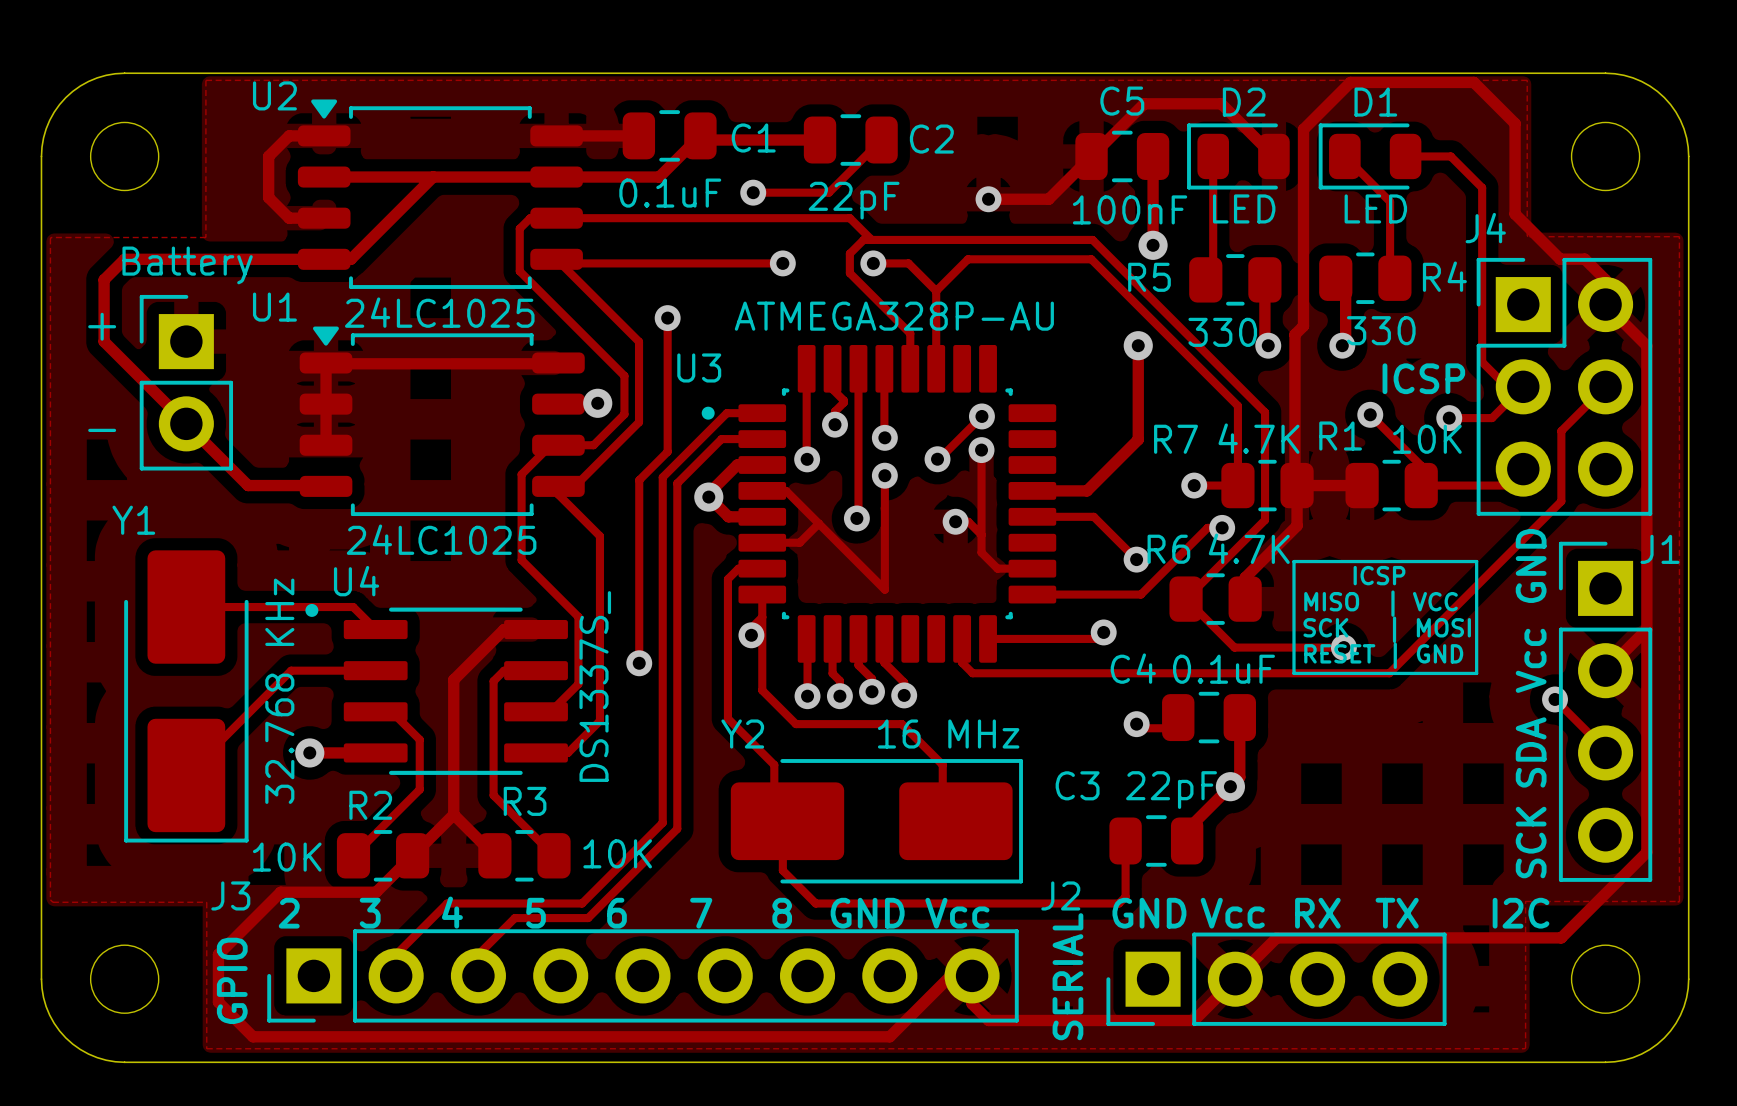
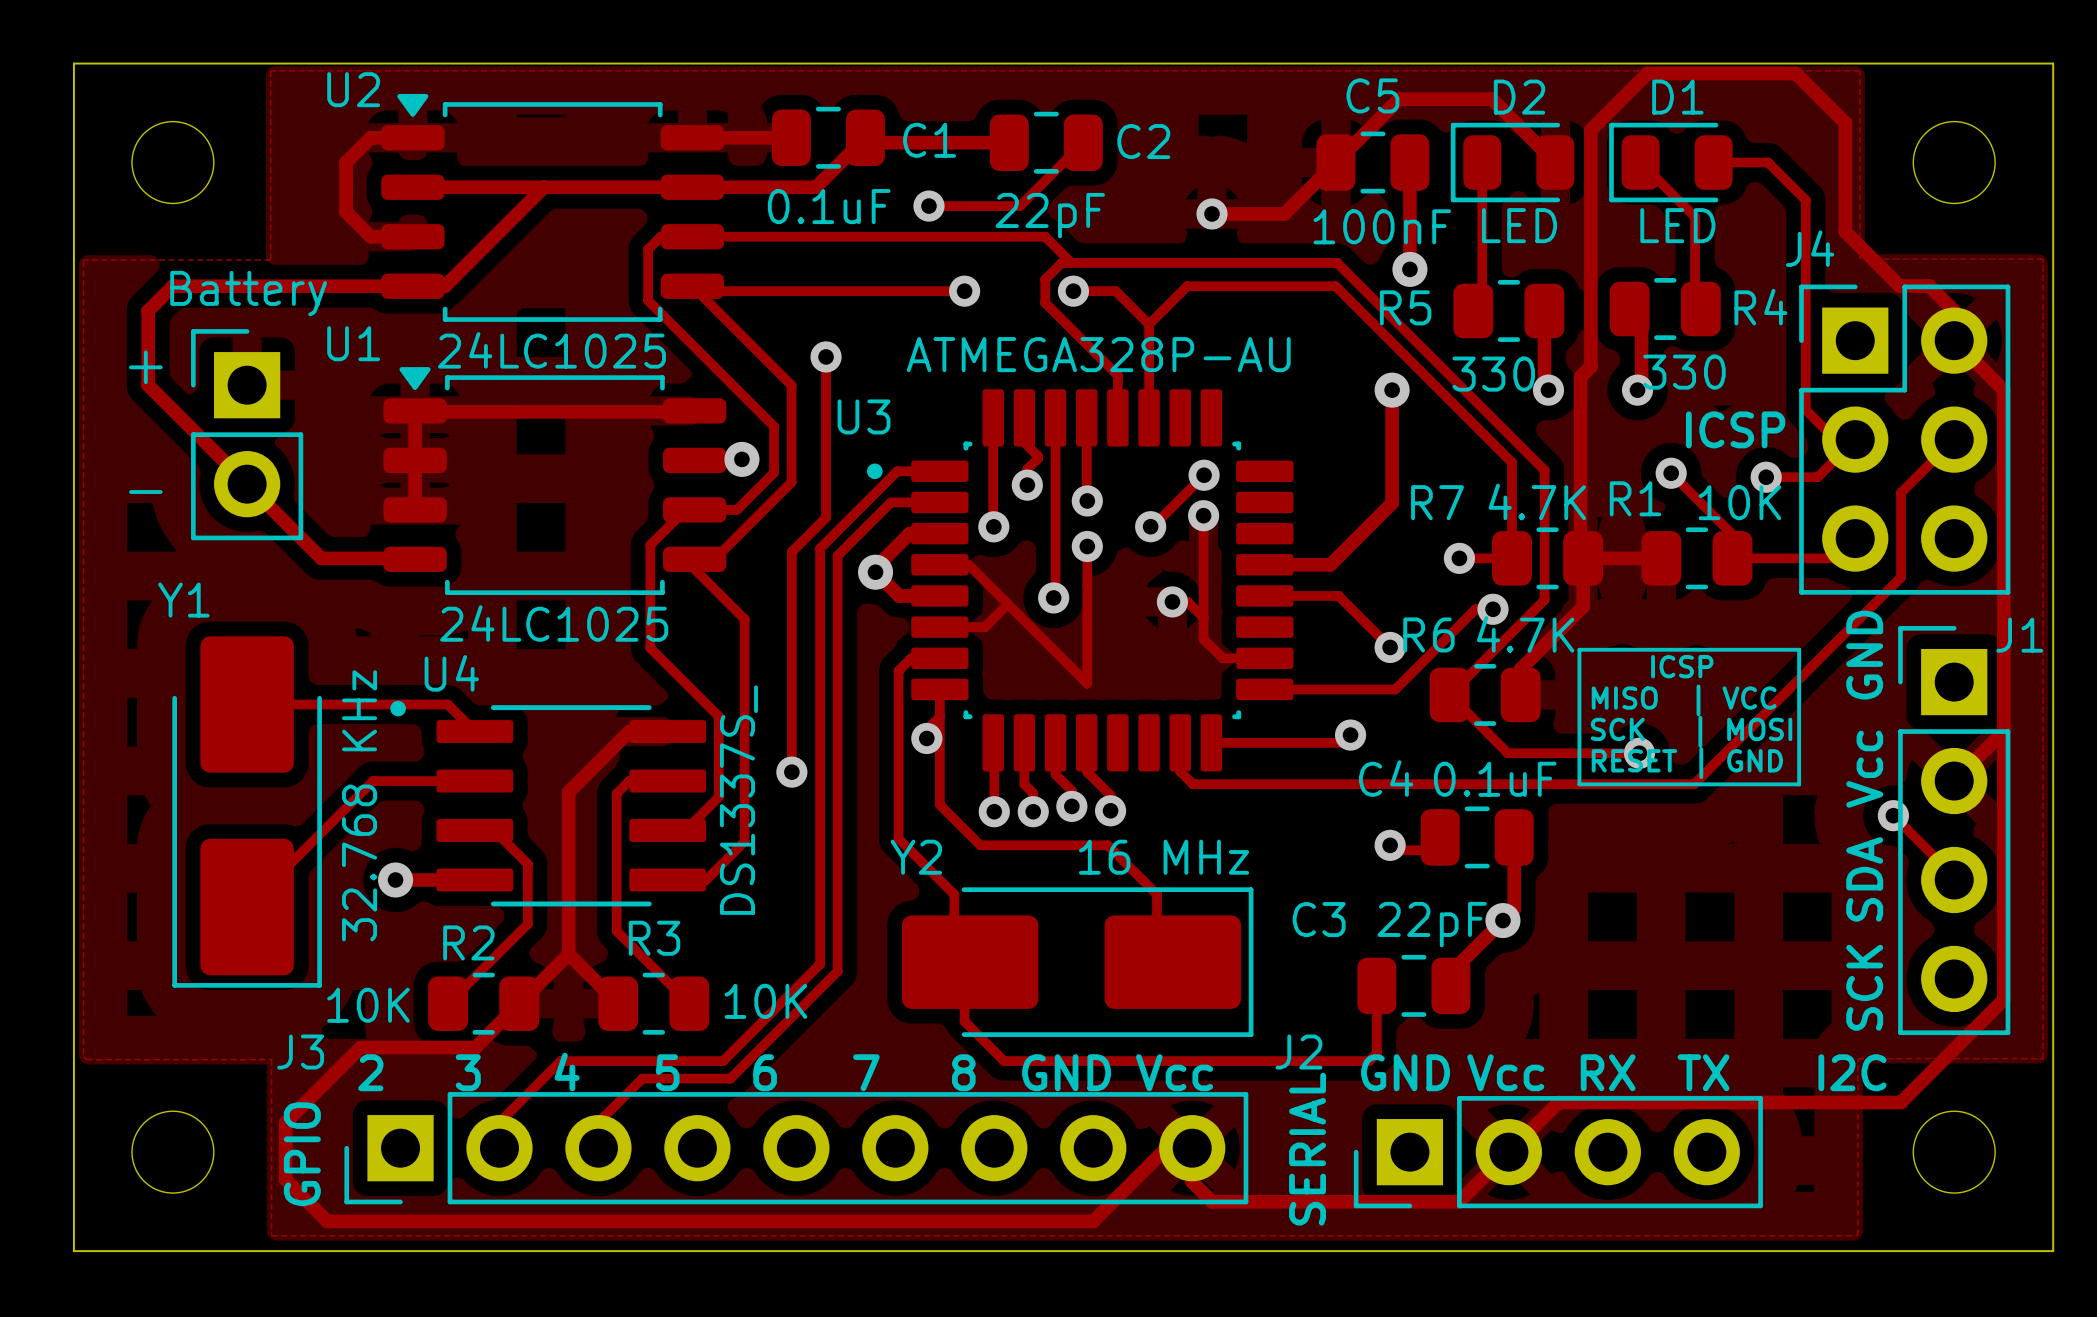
board edge: (124, 73) (1605, 73) (1624, 75) (1649, 85) (1664, 97) (1680, 120) (1686, 137) (1688, 156) (1688, 979) (1686, 997) (1675, 1023) (1664, 1037) (1649, 1049) (1633, 1057) (1605, 1062) (124, 1062) (106, 1060) (80, 1049) (65, 1037) (49, 1015) (43, 997) (41, 979) (41, 156) (46, 128) (54, 112) (65, 97) (80, 85) (97, 77) (124, 73) -> (73, 63) (73, 1251) (2053, 1251) (2053, 63) (73, 63)

